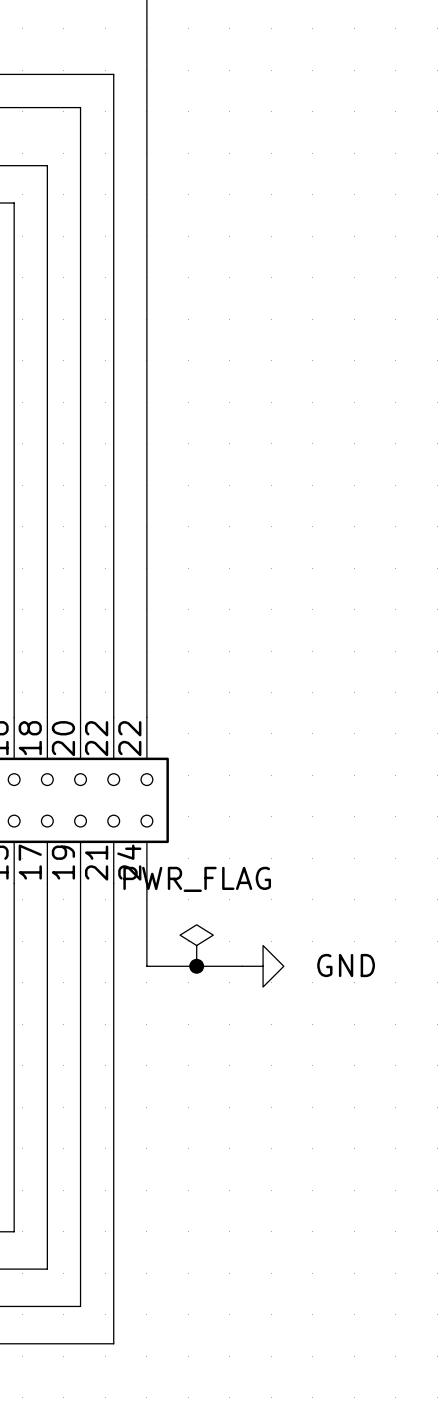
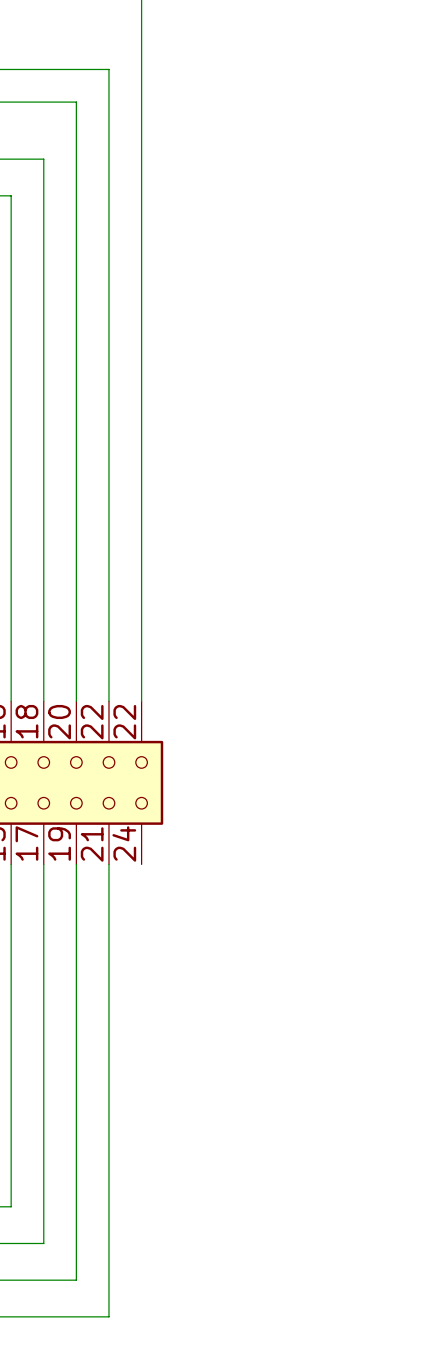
wire: (146, 883) (146, 966) (242, 966) -> none
power symbol: PWR_FLAG (196, 945) -> none
junction: (196, 966) -> none
power symbol: GND (263, 966) -> none

